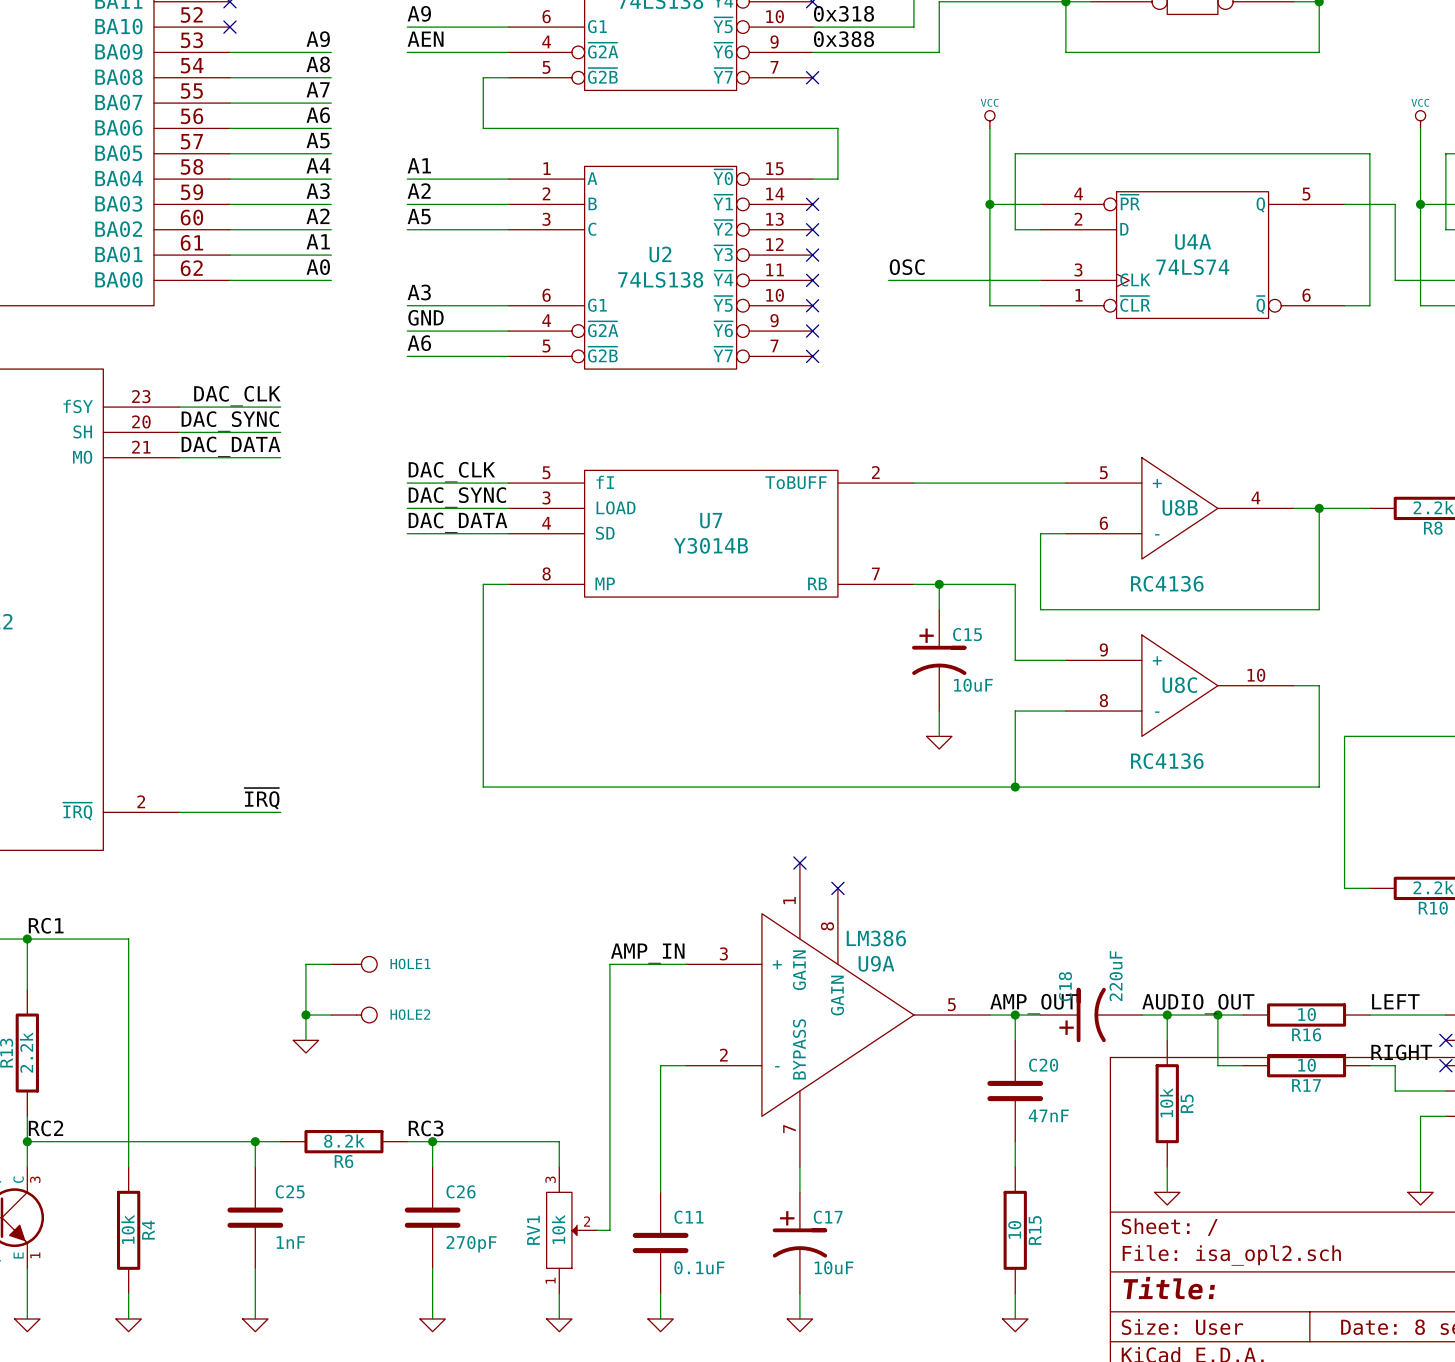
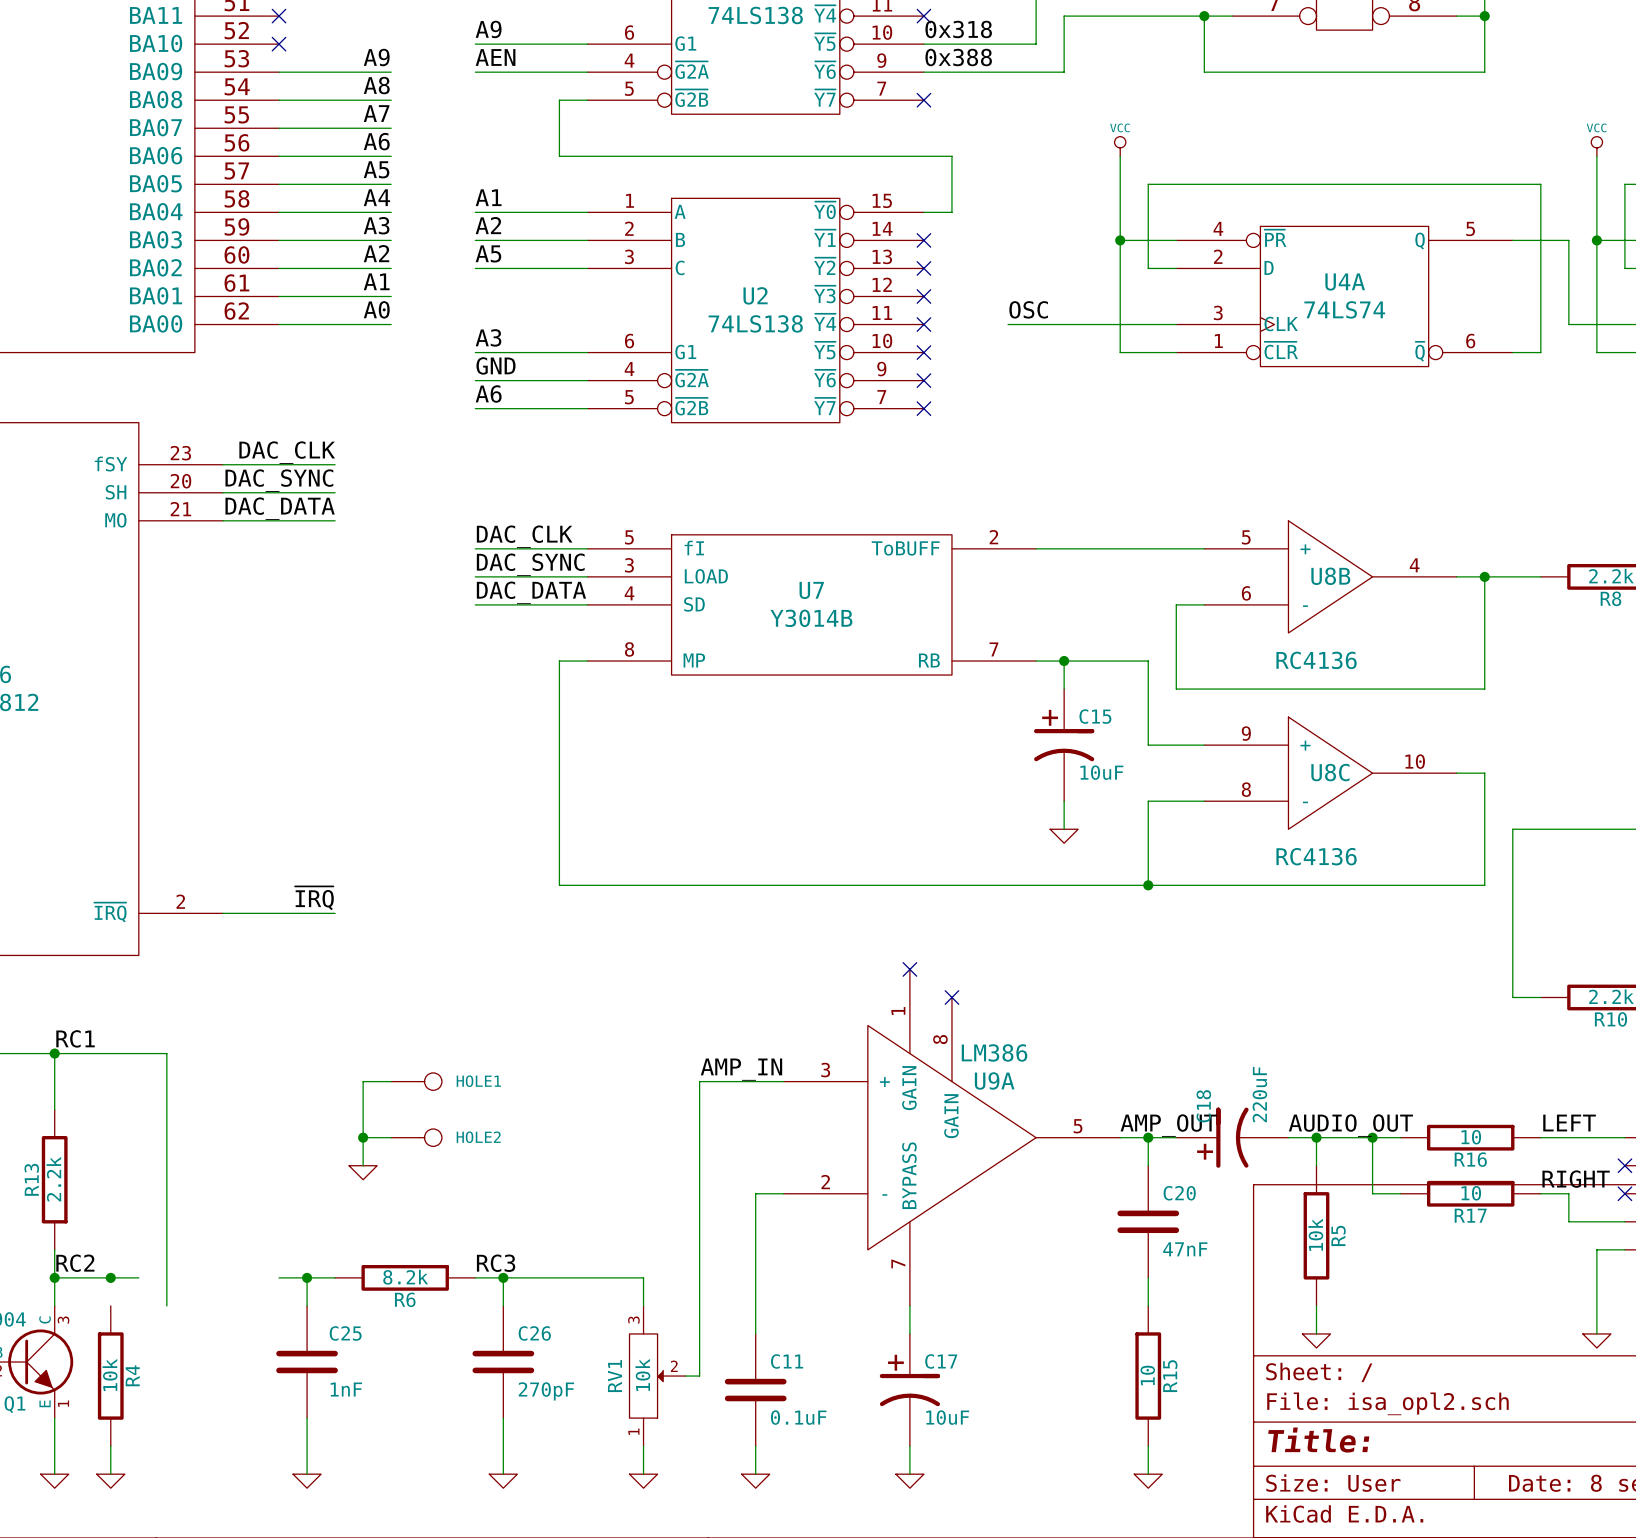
junction: none -> (110, 1277)
wire: (103, 1141) (229, 1141) -> none
R4 position: (128, 1230) -> (110, 1376)
wire: (128, 1293) (128, 1318) -> (110, 1446) (110, 1474)
power symbol position: (128, 1325) -> (110, 1481)

